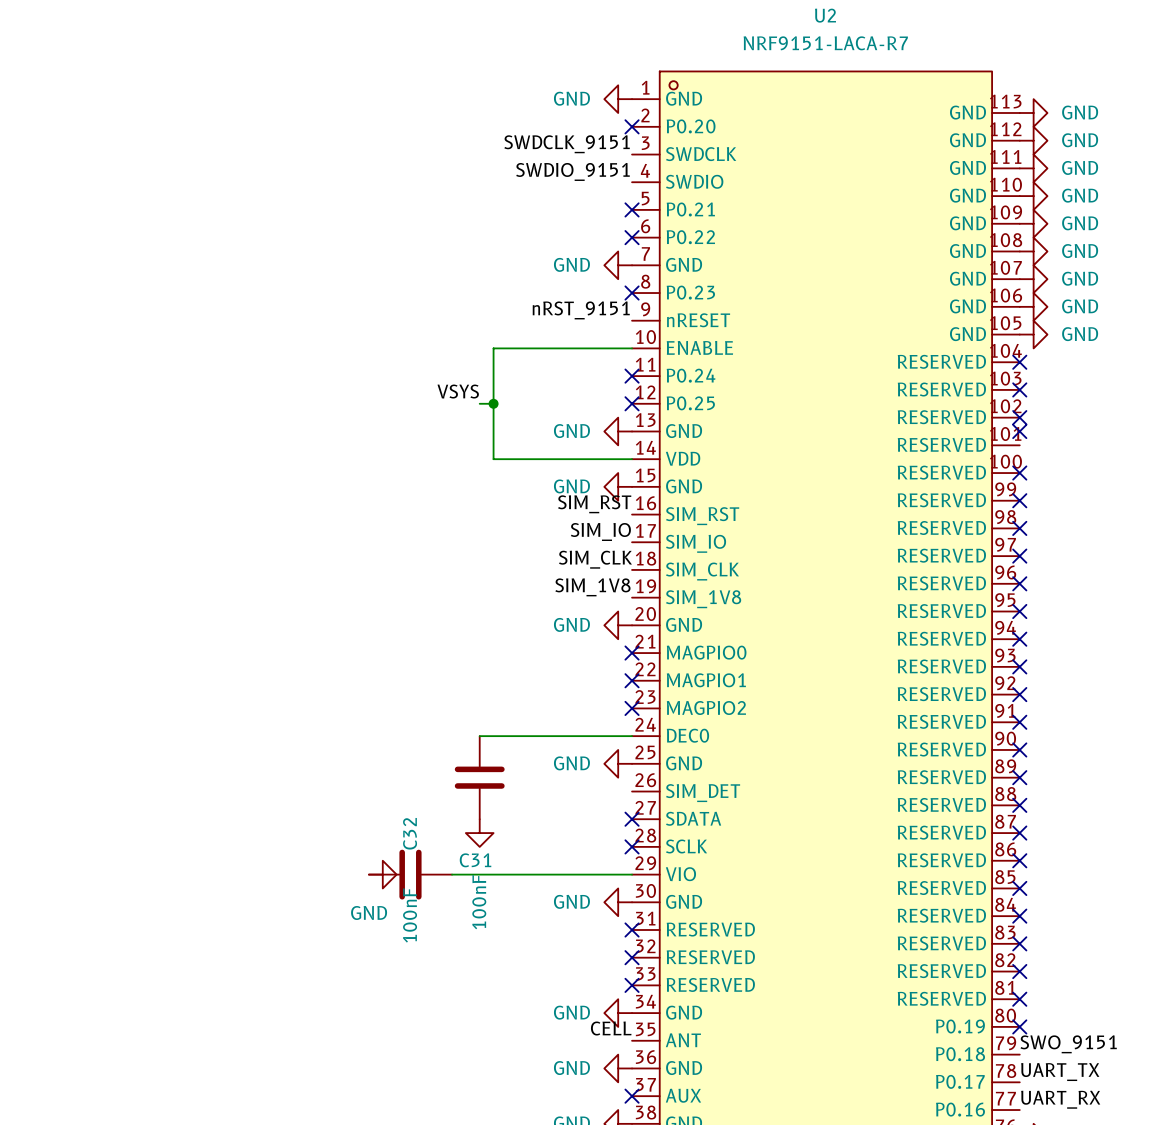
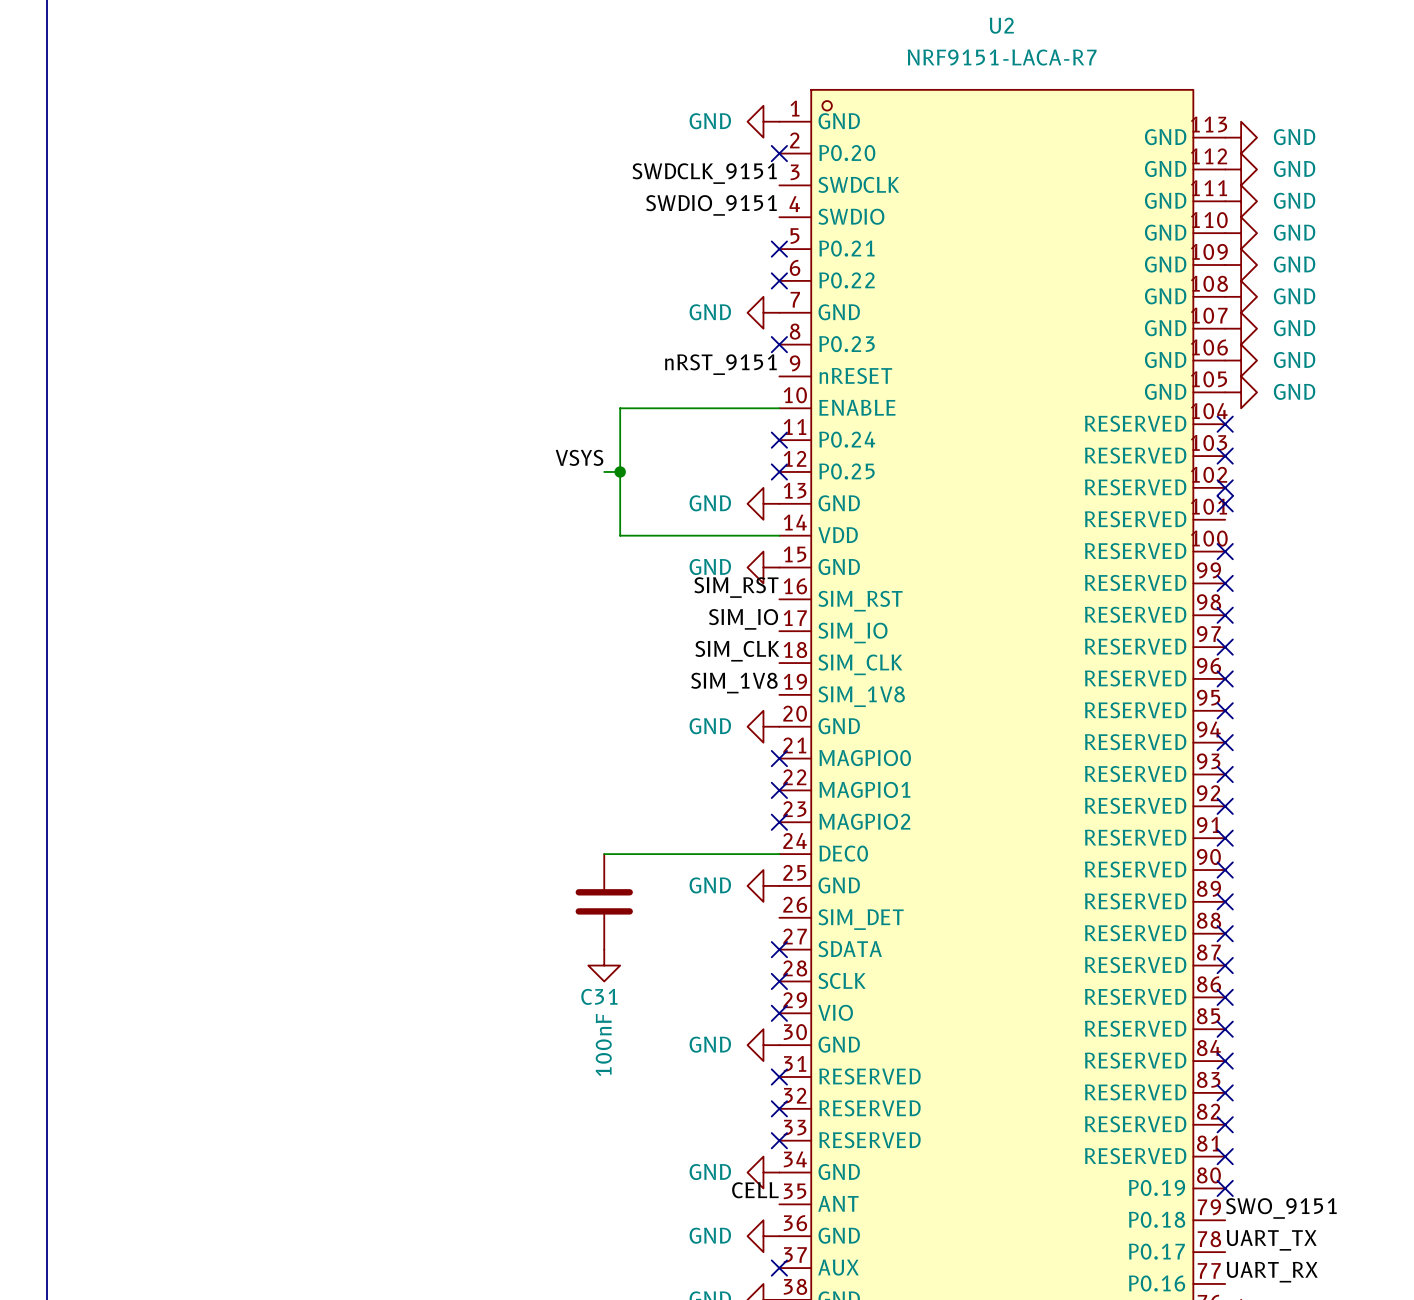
power symbol: GND (382, 874) -> none
C32: 100nF (410, 874) -> none
wire: (452, 874) (632, 874) -> none
no-connect mark: none -> (779, 1013)

